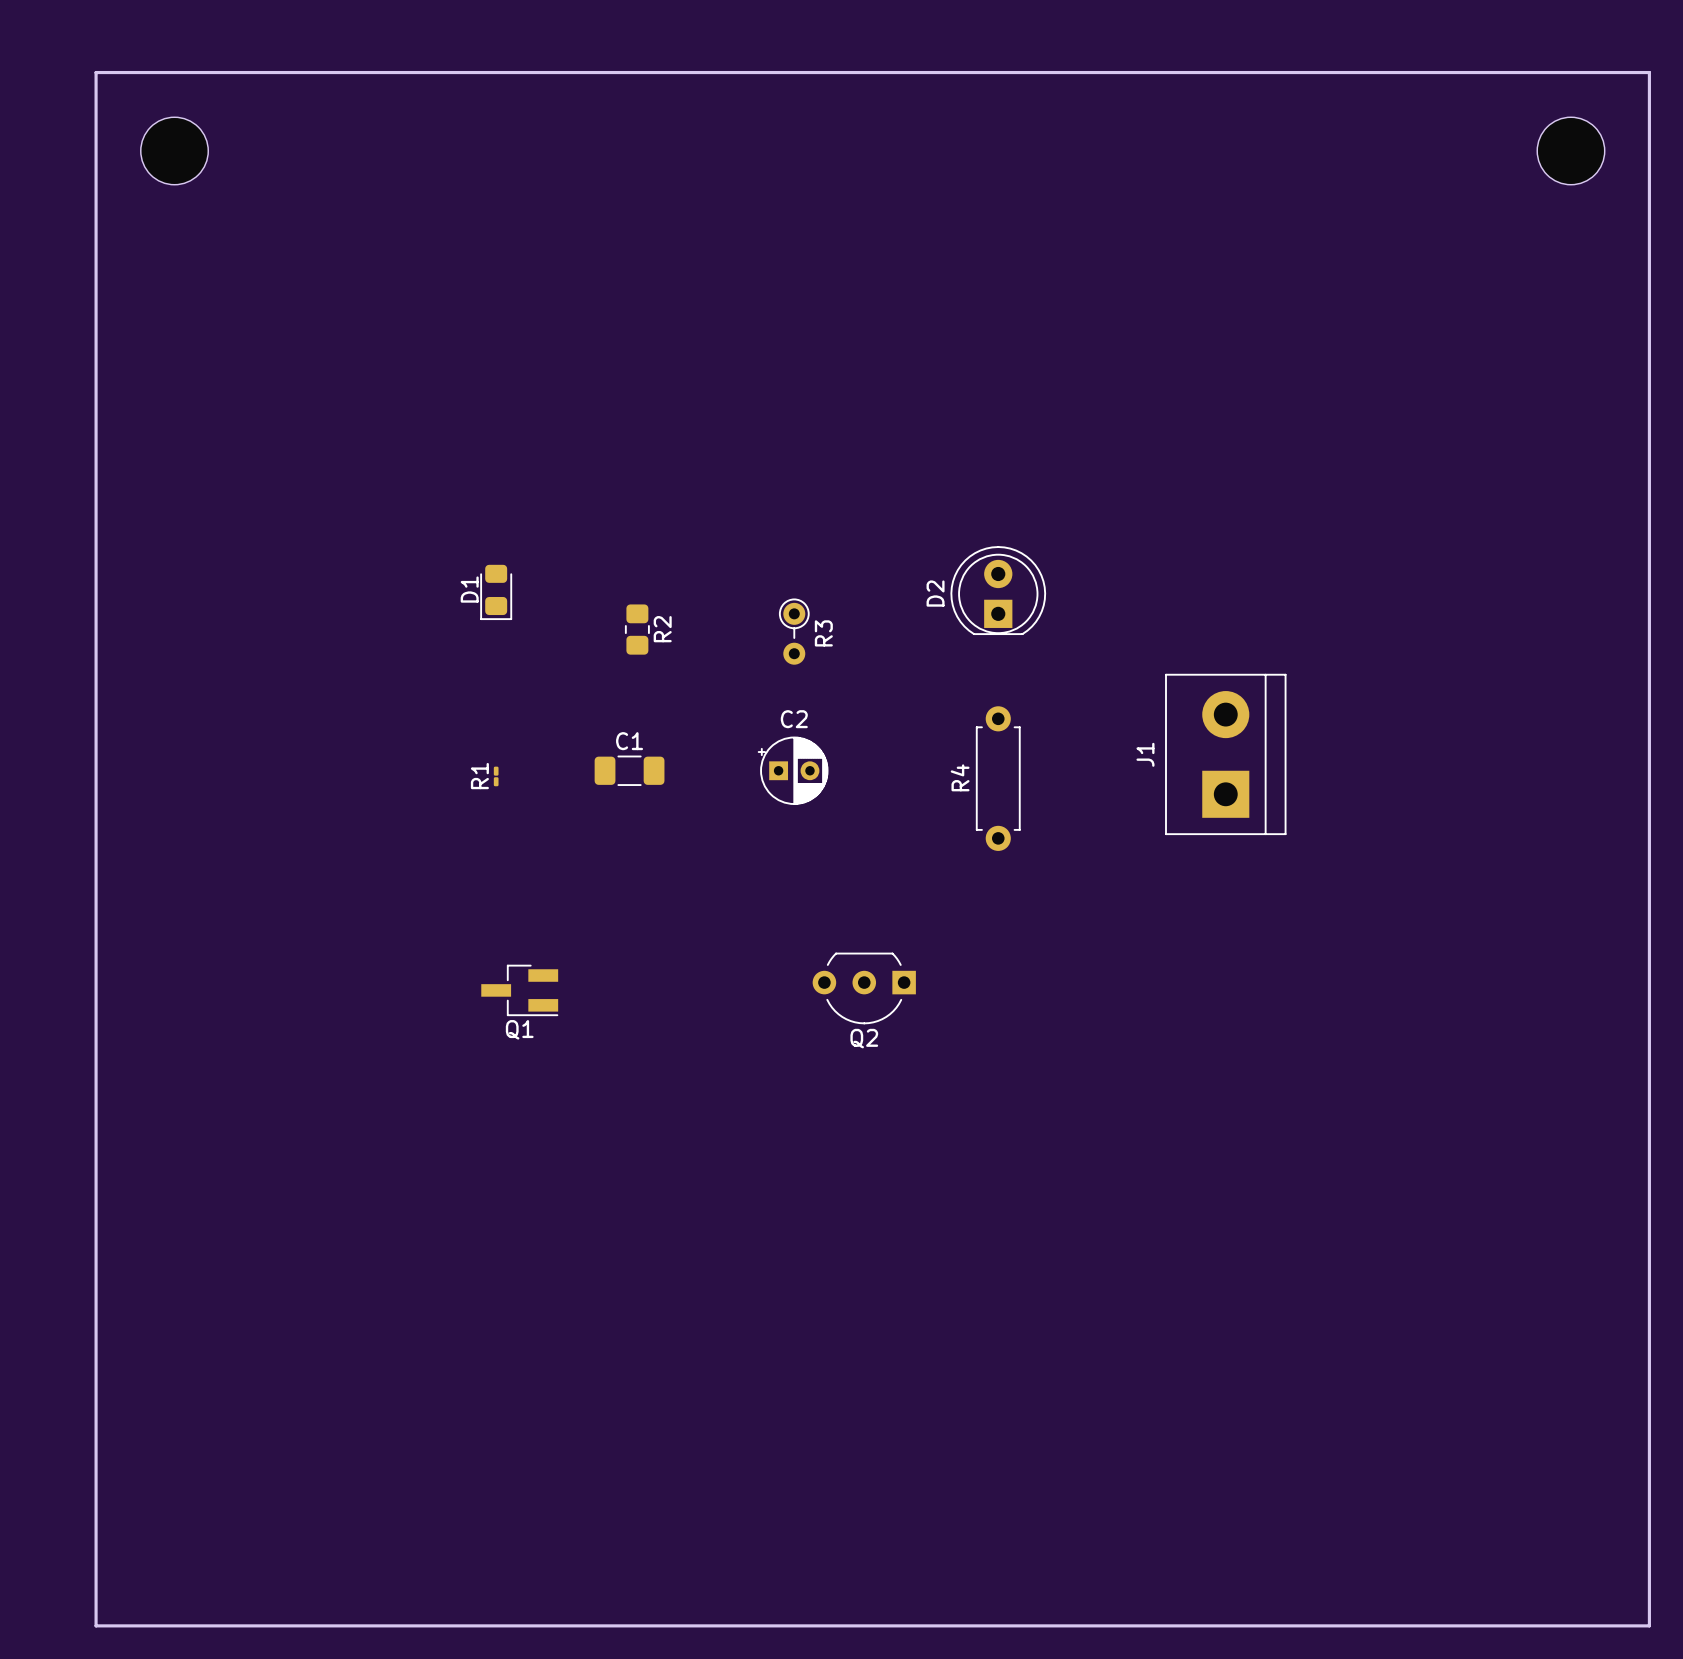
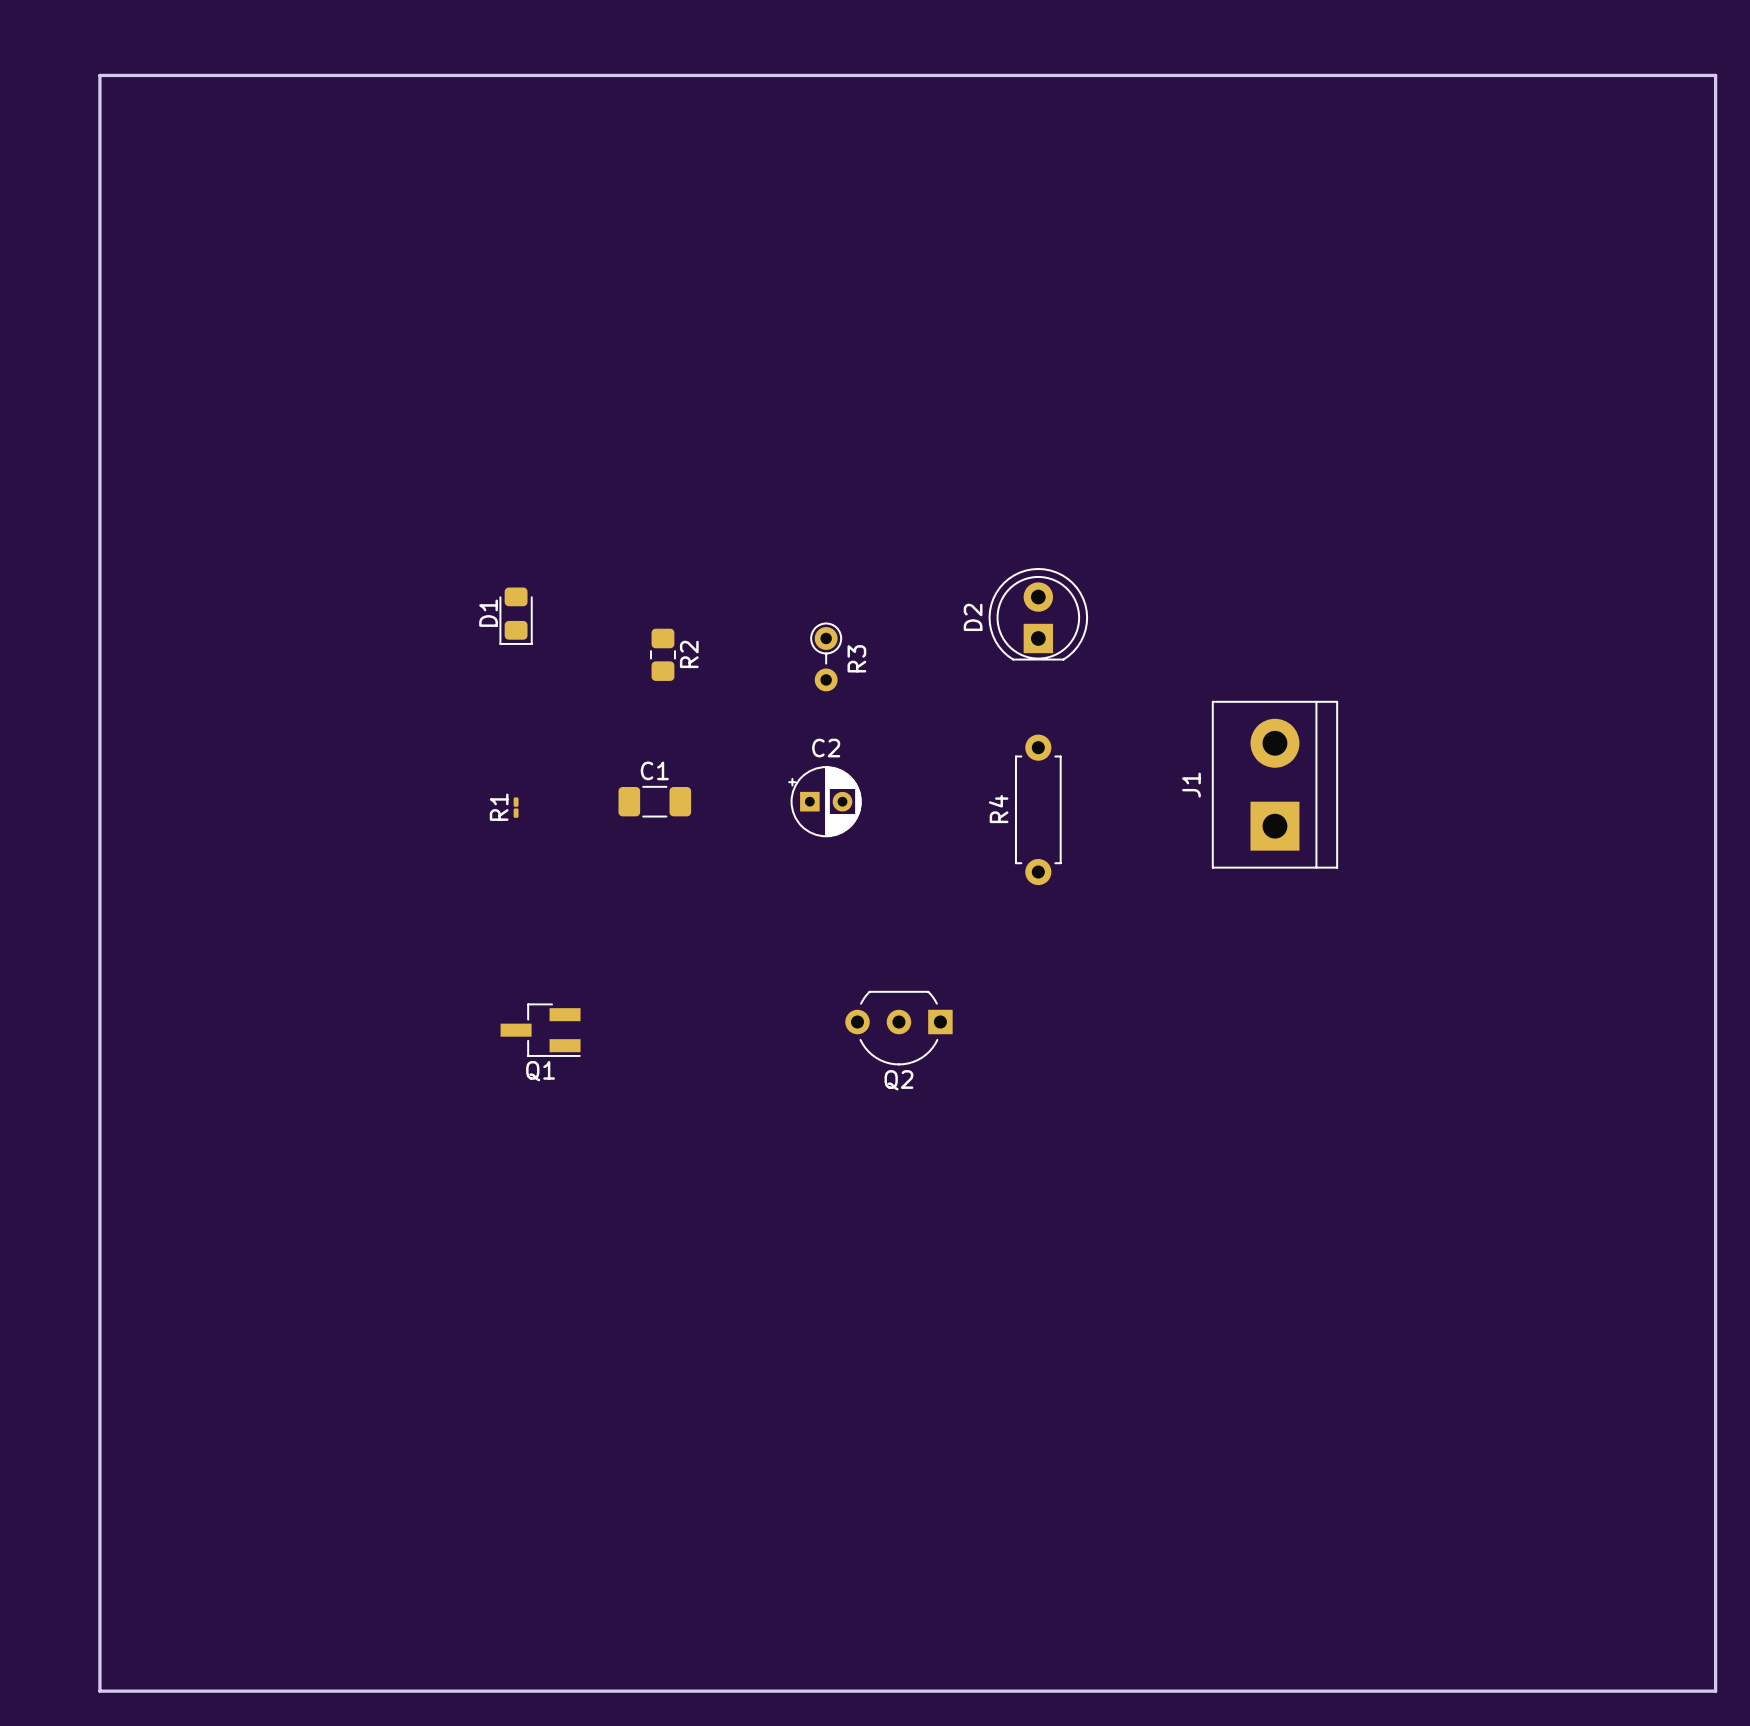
part: (174, 150) -> none
part: (1570, 150) -> none

